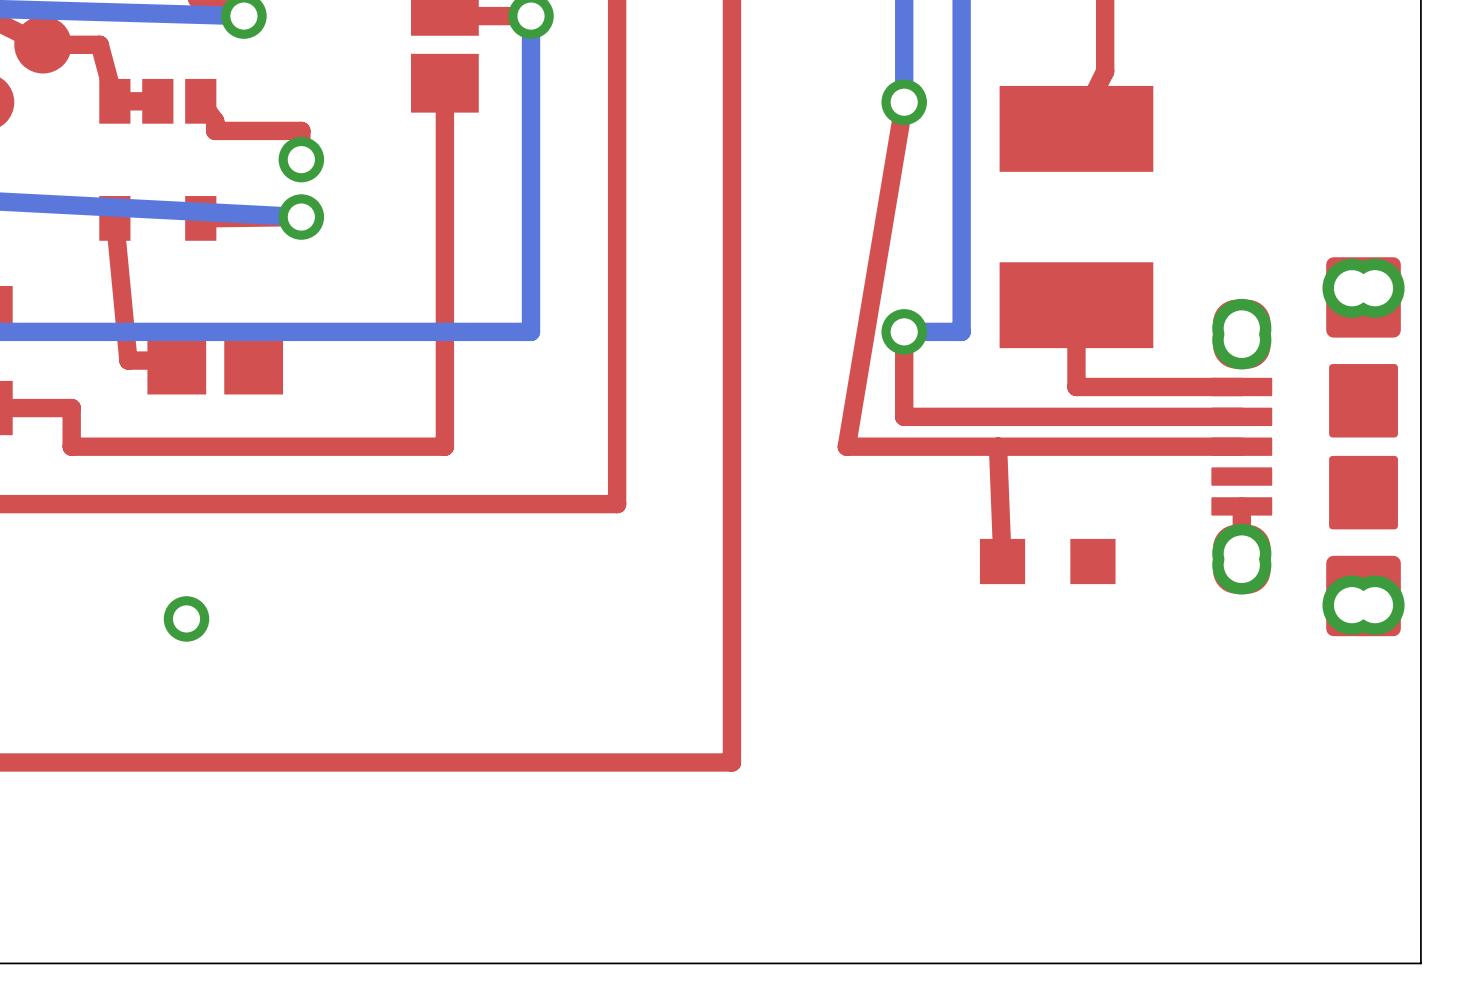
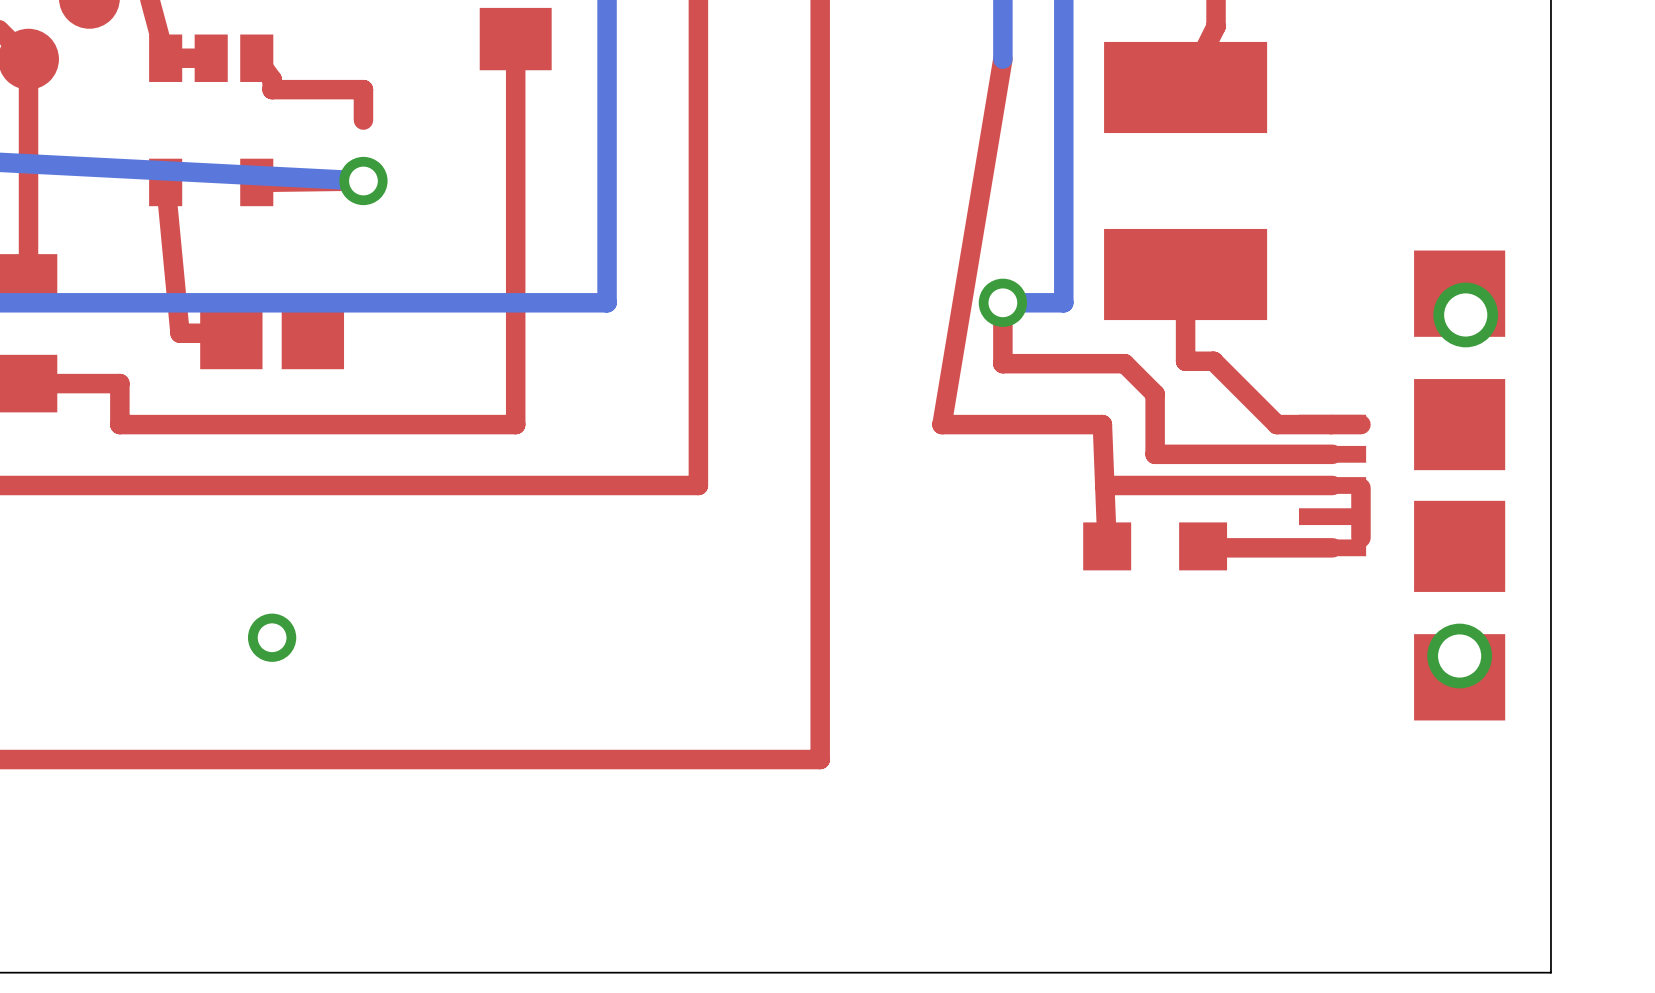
via: (904, 102) -> none
via: (301, 159) -> none
via: none -> (1465, 314)
top track: (1241, 386) (1102, 386) -> (1276, 424) (1213, 361)
top track: (904, 389) (904, 416) (1241, 416) -> (1002, 363) (1124, 363) (1155, 394) (1155, 454) (1332, 454)
top track: (1162, 446) (998, 446) -> none
part: (1307, 446) -> none
top track: none -> (1332, 485) (1104, 485)
part: none -> (1402, 485)
top track: none -> (1203, 546) (1332, 547)
via position: (186, 618) -> (272, 637)
via: none -> (1459, 656)

